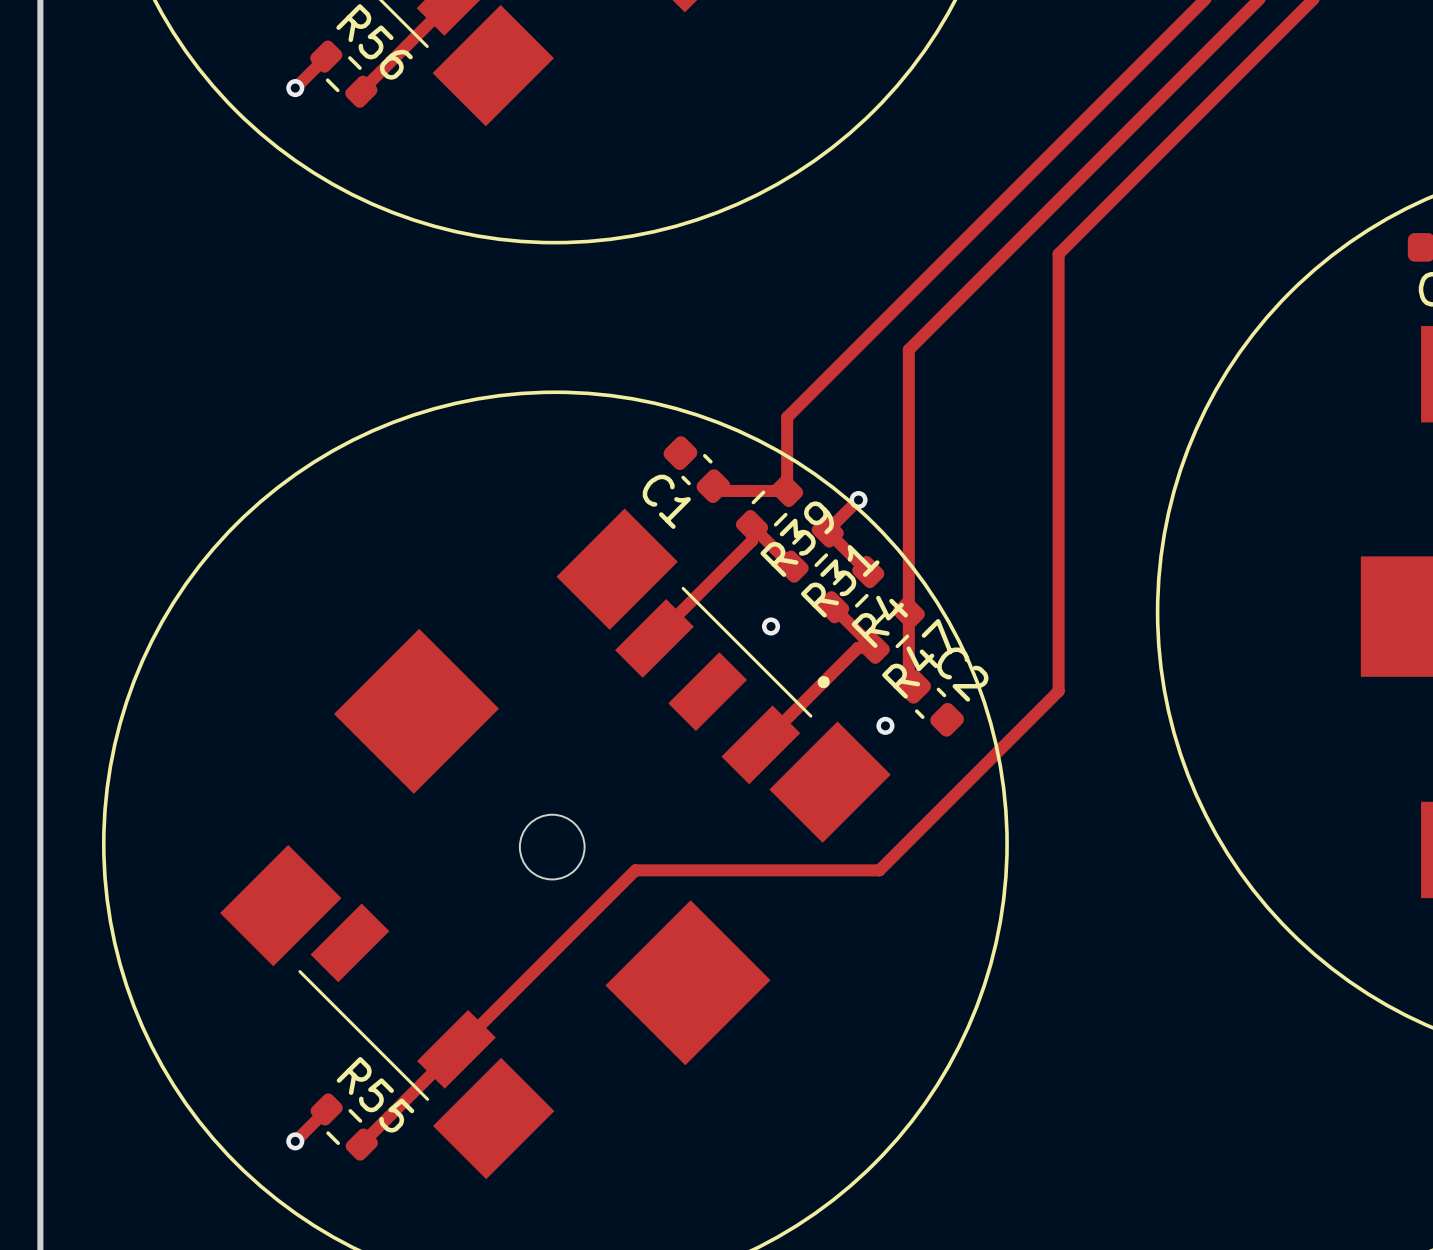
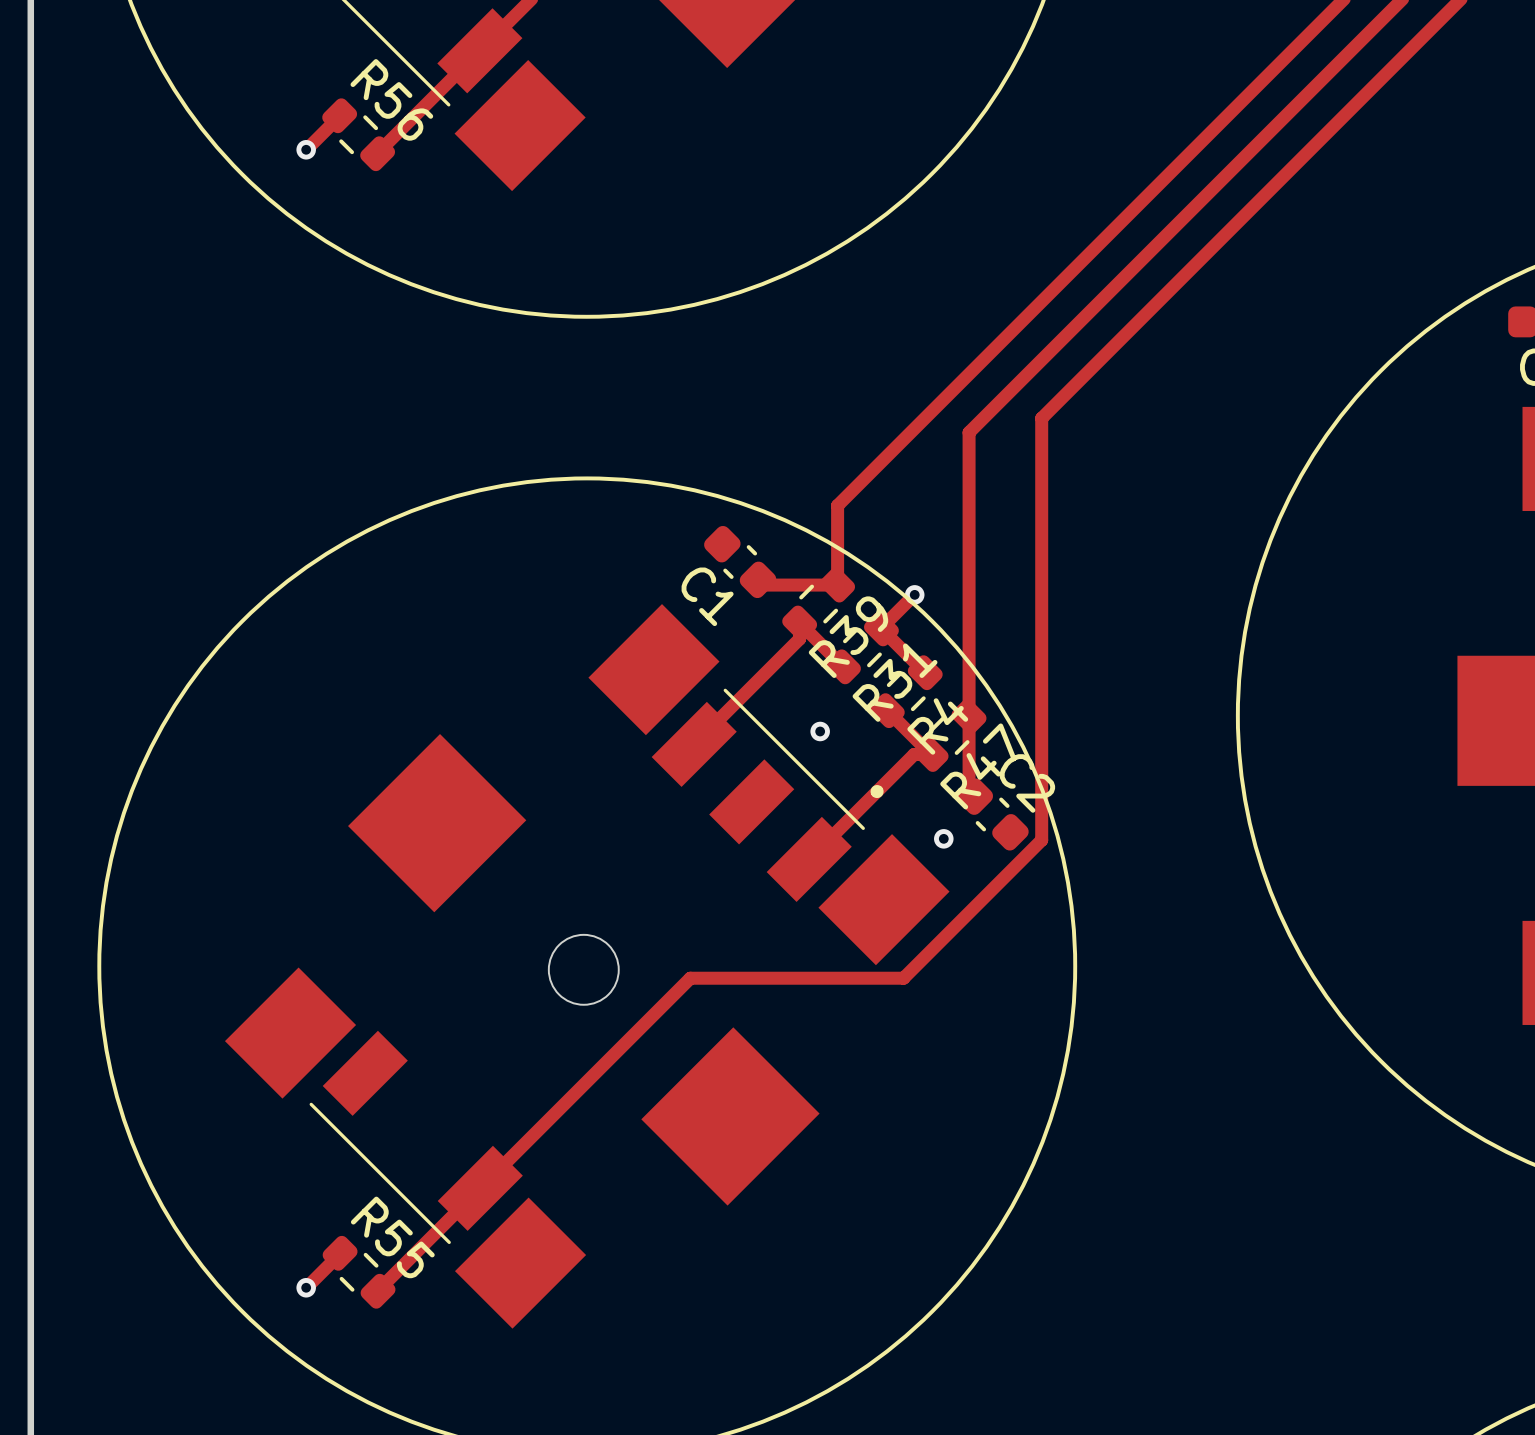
top track: (1058, 254) (1058, 691) (879, 870) (635, 870) -> (1130, 329) (1041, 418) (1041, 840) (903, 978) (690, 978) (673, 994)

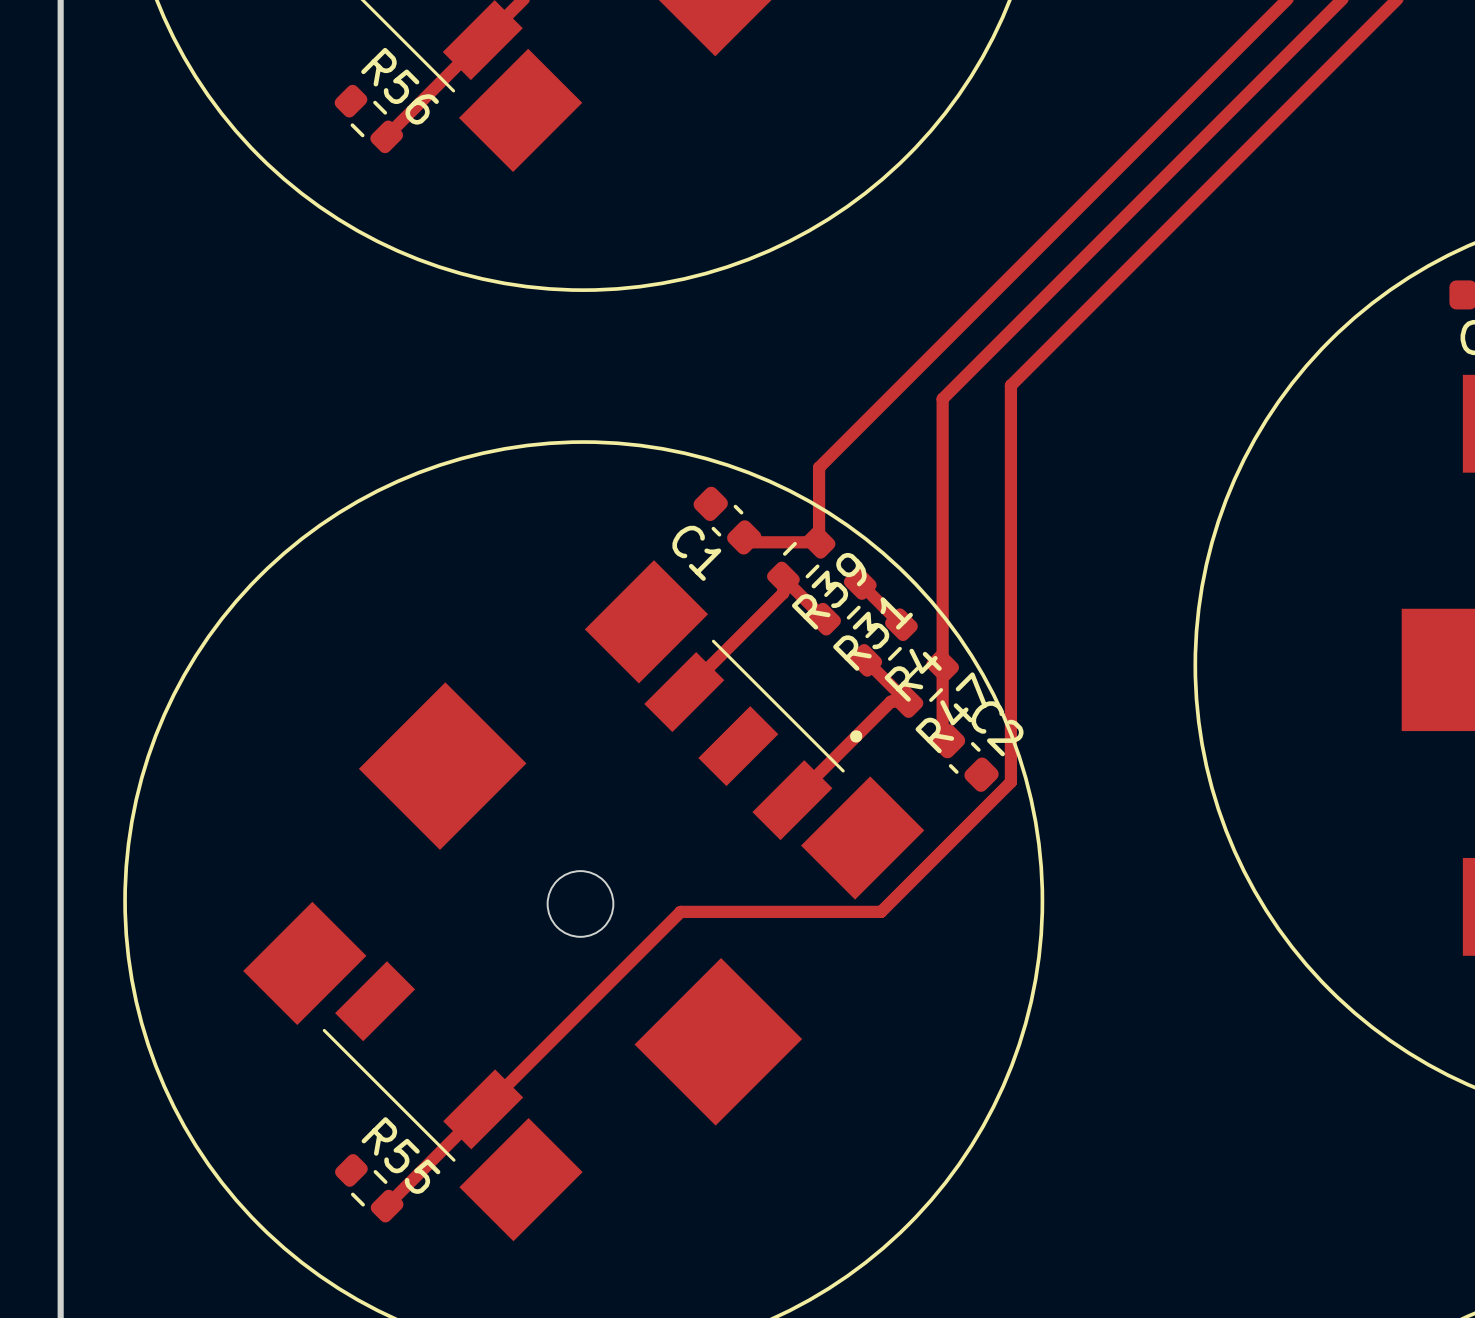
top track: (340, 116) (306, 149) -> none
via: (306, 149) -> none
top track: (914, 594) (880, 628) -> none
via: (914, 594) -> none
via: (820, 731) -> none
via: (943, 838) -> none
top track: (340, 1254) (306, 1287) -> none
via: (306, 1287) -> none

